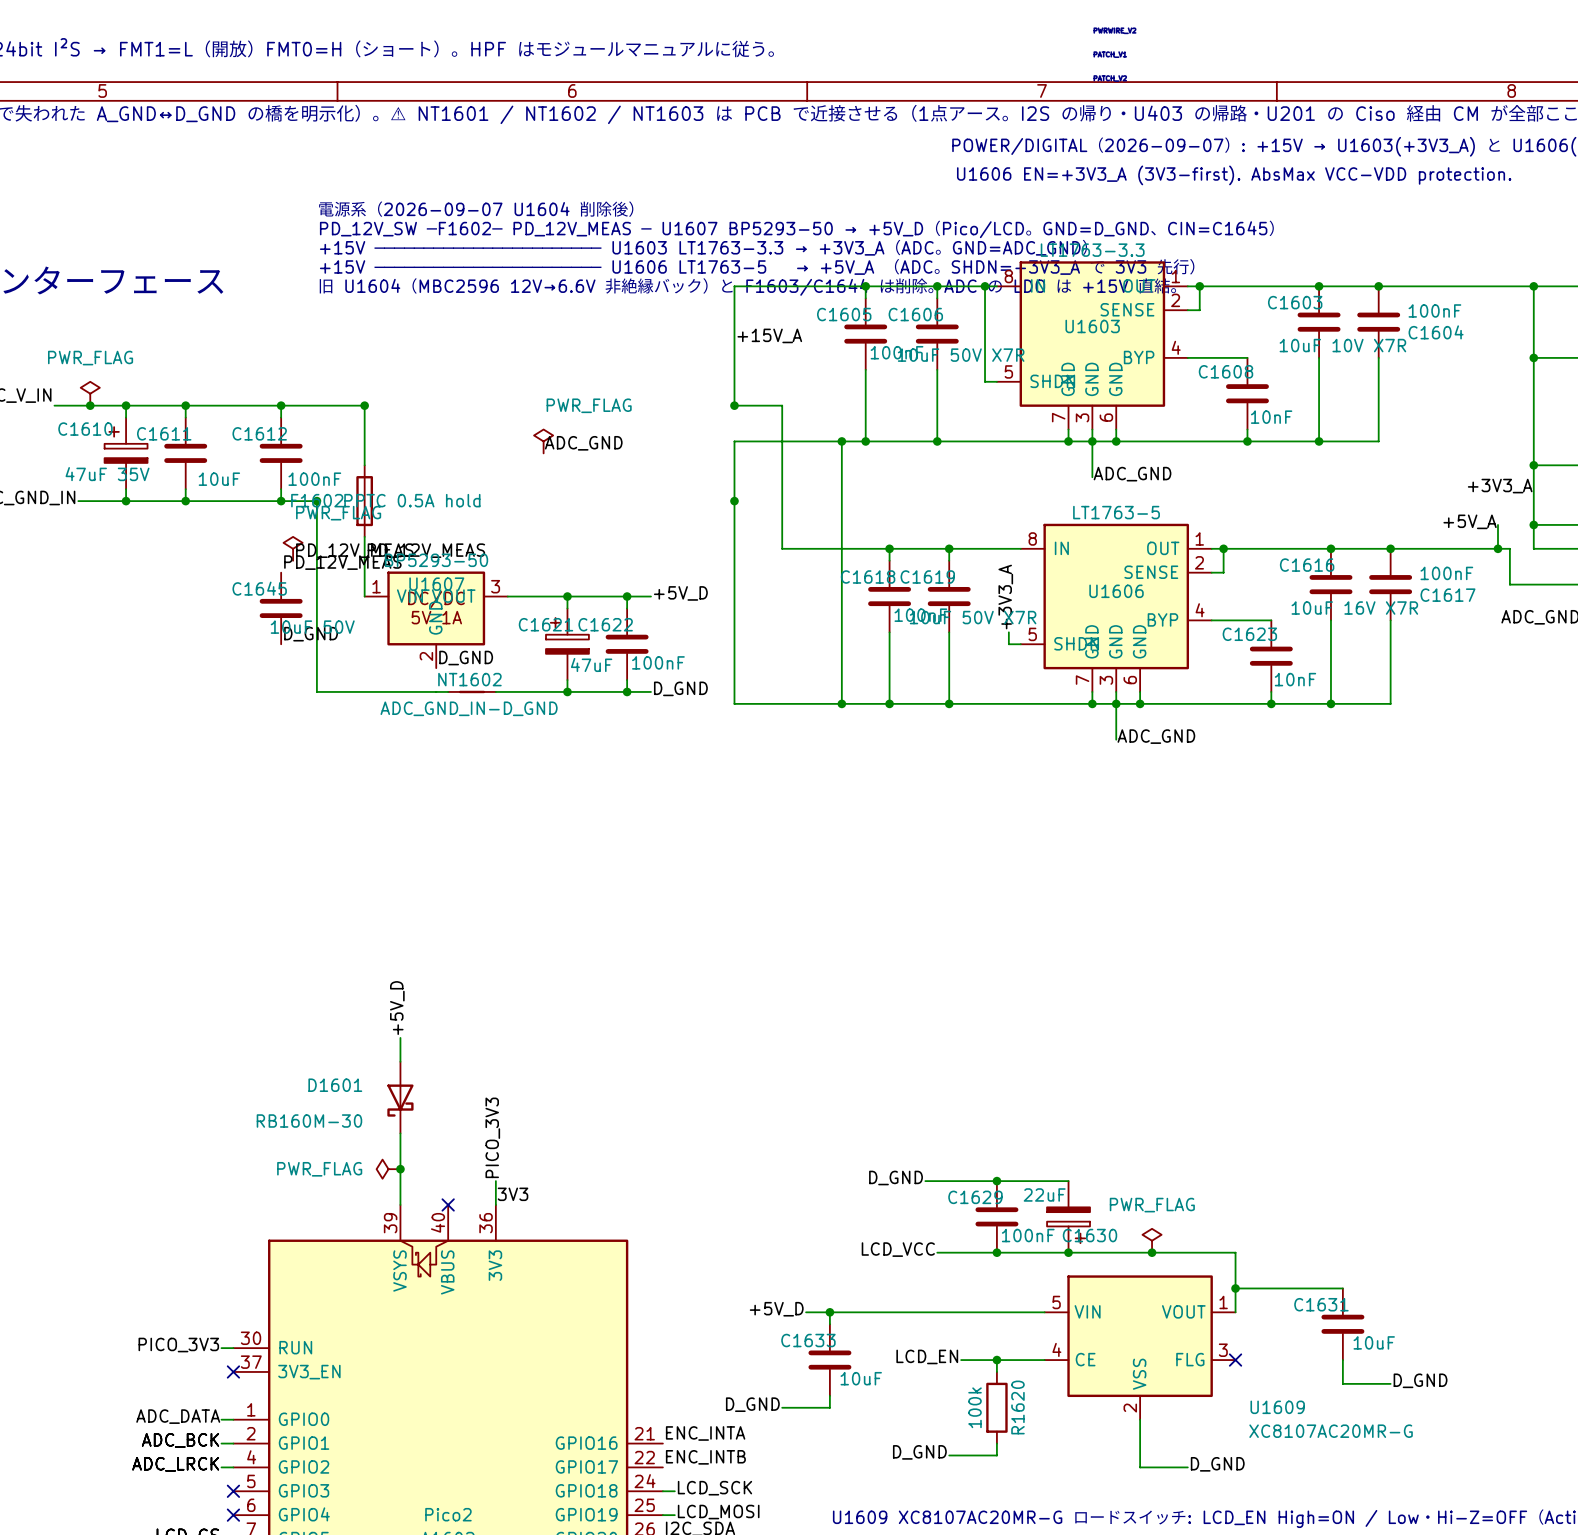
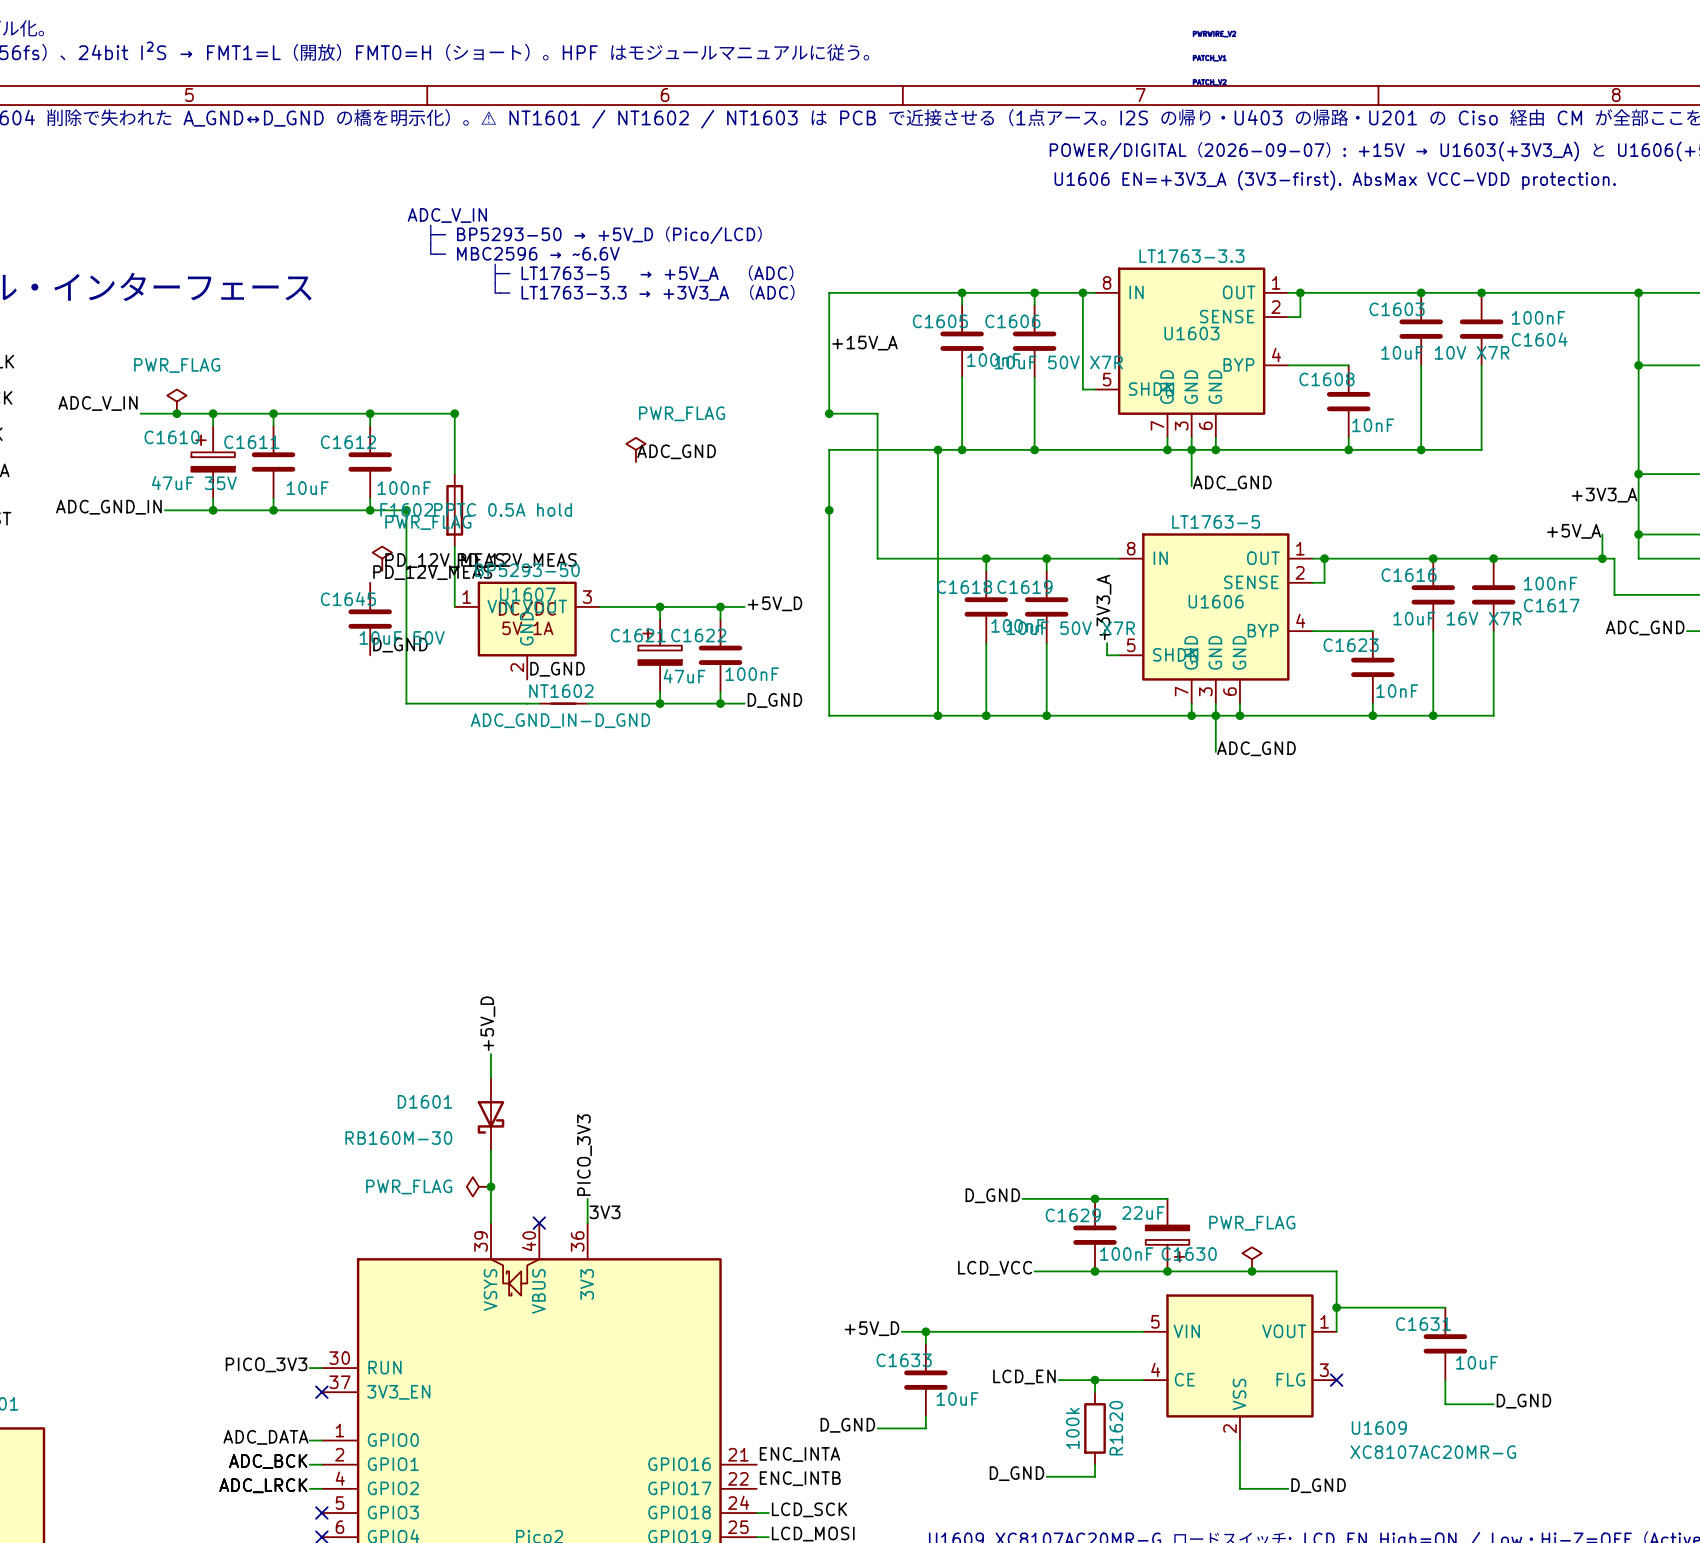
text: 電源系（2026-09-07 U1604 削除後） (476, 209) -> ADC_V_IN (447, 215)
text: PD_12V_SW ─F1602─ PD_12V_MEAS ─ U1607 BP5293-50 → +5V_D（Pico/LCD。GND=D_GND、CIN=C1645） (797, 228) -> ├─ BP5293-50 → +5V_D（Pico/LCD） (595, 234)
text: +15V ─────────────────────── U1603 LT1763-3.3 → +3V3_A（ADC。GND=ADC_GND） (703, 247) -> └─ MBC2596 → ~6.6V (524, 252)
text: +15V ─────────────────────── U1606 LT1763-5 → +5V_A （ADC。SHDN=+3V3_A で 3V3 先行） (757, 266) -> ├─ LT1763-5 → +5V_A （ADC） (643, 273)
text: 旧 U1604（MBC2596 12V→6.6V 非絶縁バック）と F1603/C1644 は削除。ADC の LDO は +15V 直結。 (747, 286) -> └─ LT1763-3.3 → +3V3_A （ADC） (644, 291)

